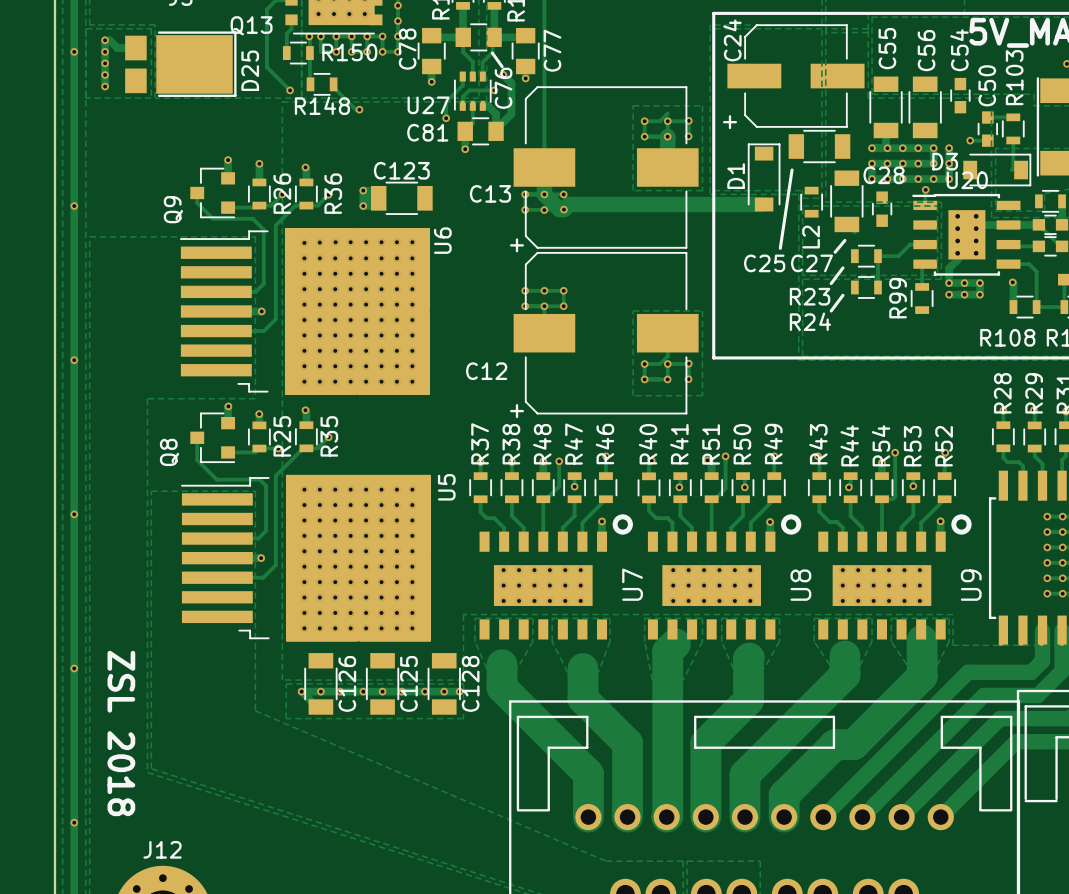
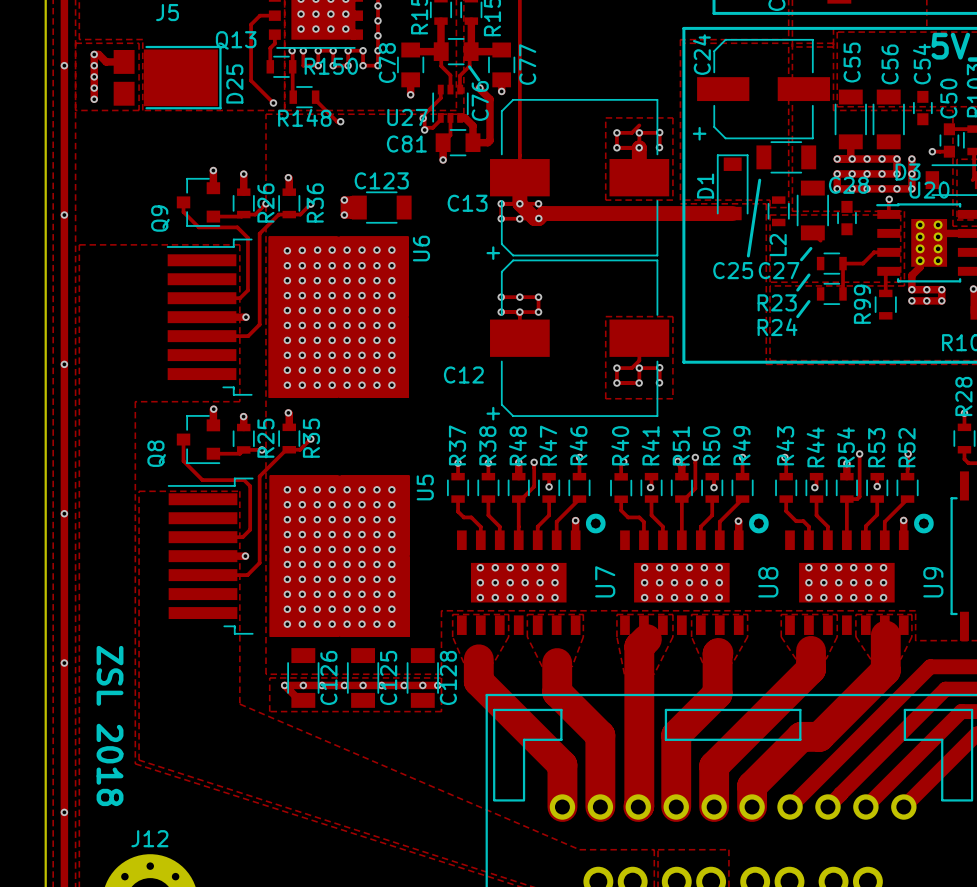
track: none -> (478, 88) (490, 99) (490, 140) (487, 142) (472, 142)
track: (503, 74) (511, 83) (511, 114) (496, 129) -> none
track: (494, 90) (469, 90) (462, 96) (462, 105) -> none
via position: (494, 90) -> (423, 118)
track: none -> (440, 119) (432, 127) (427, 127)

